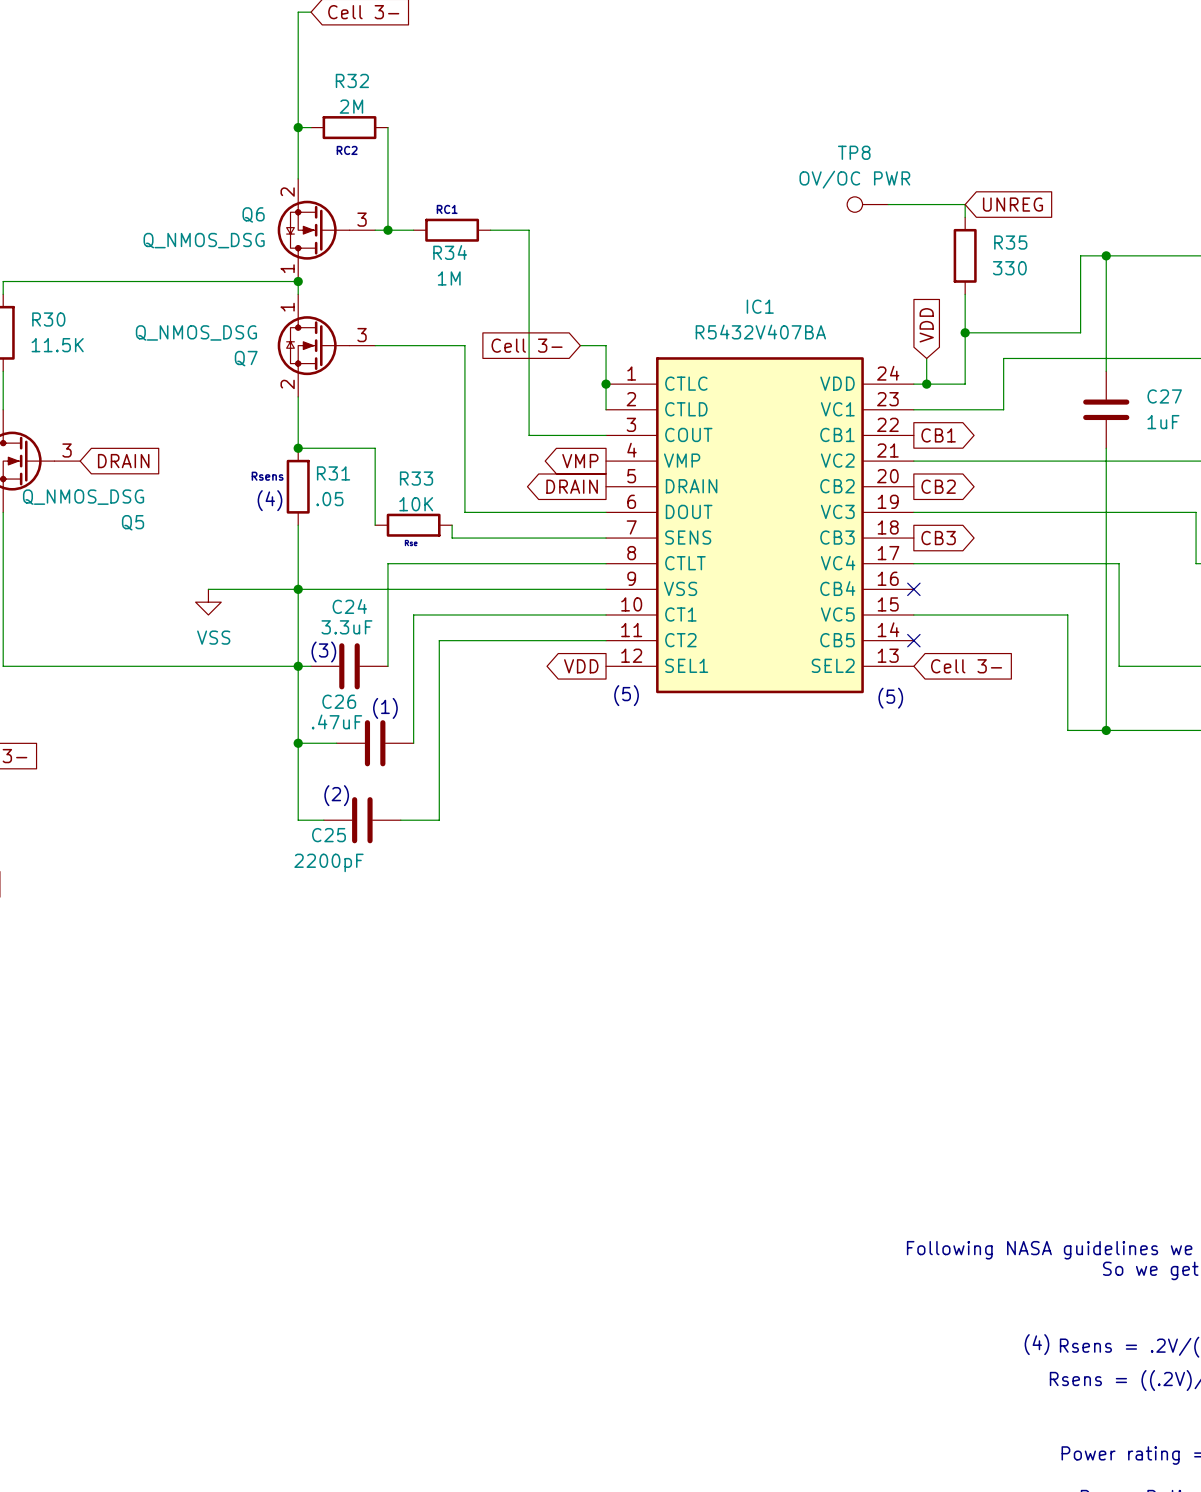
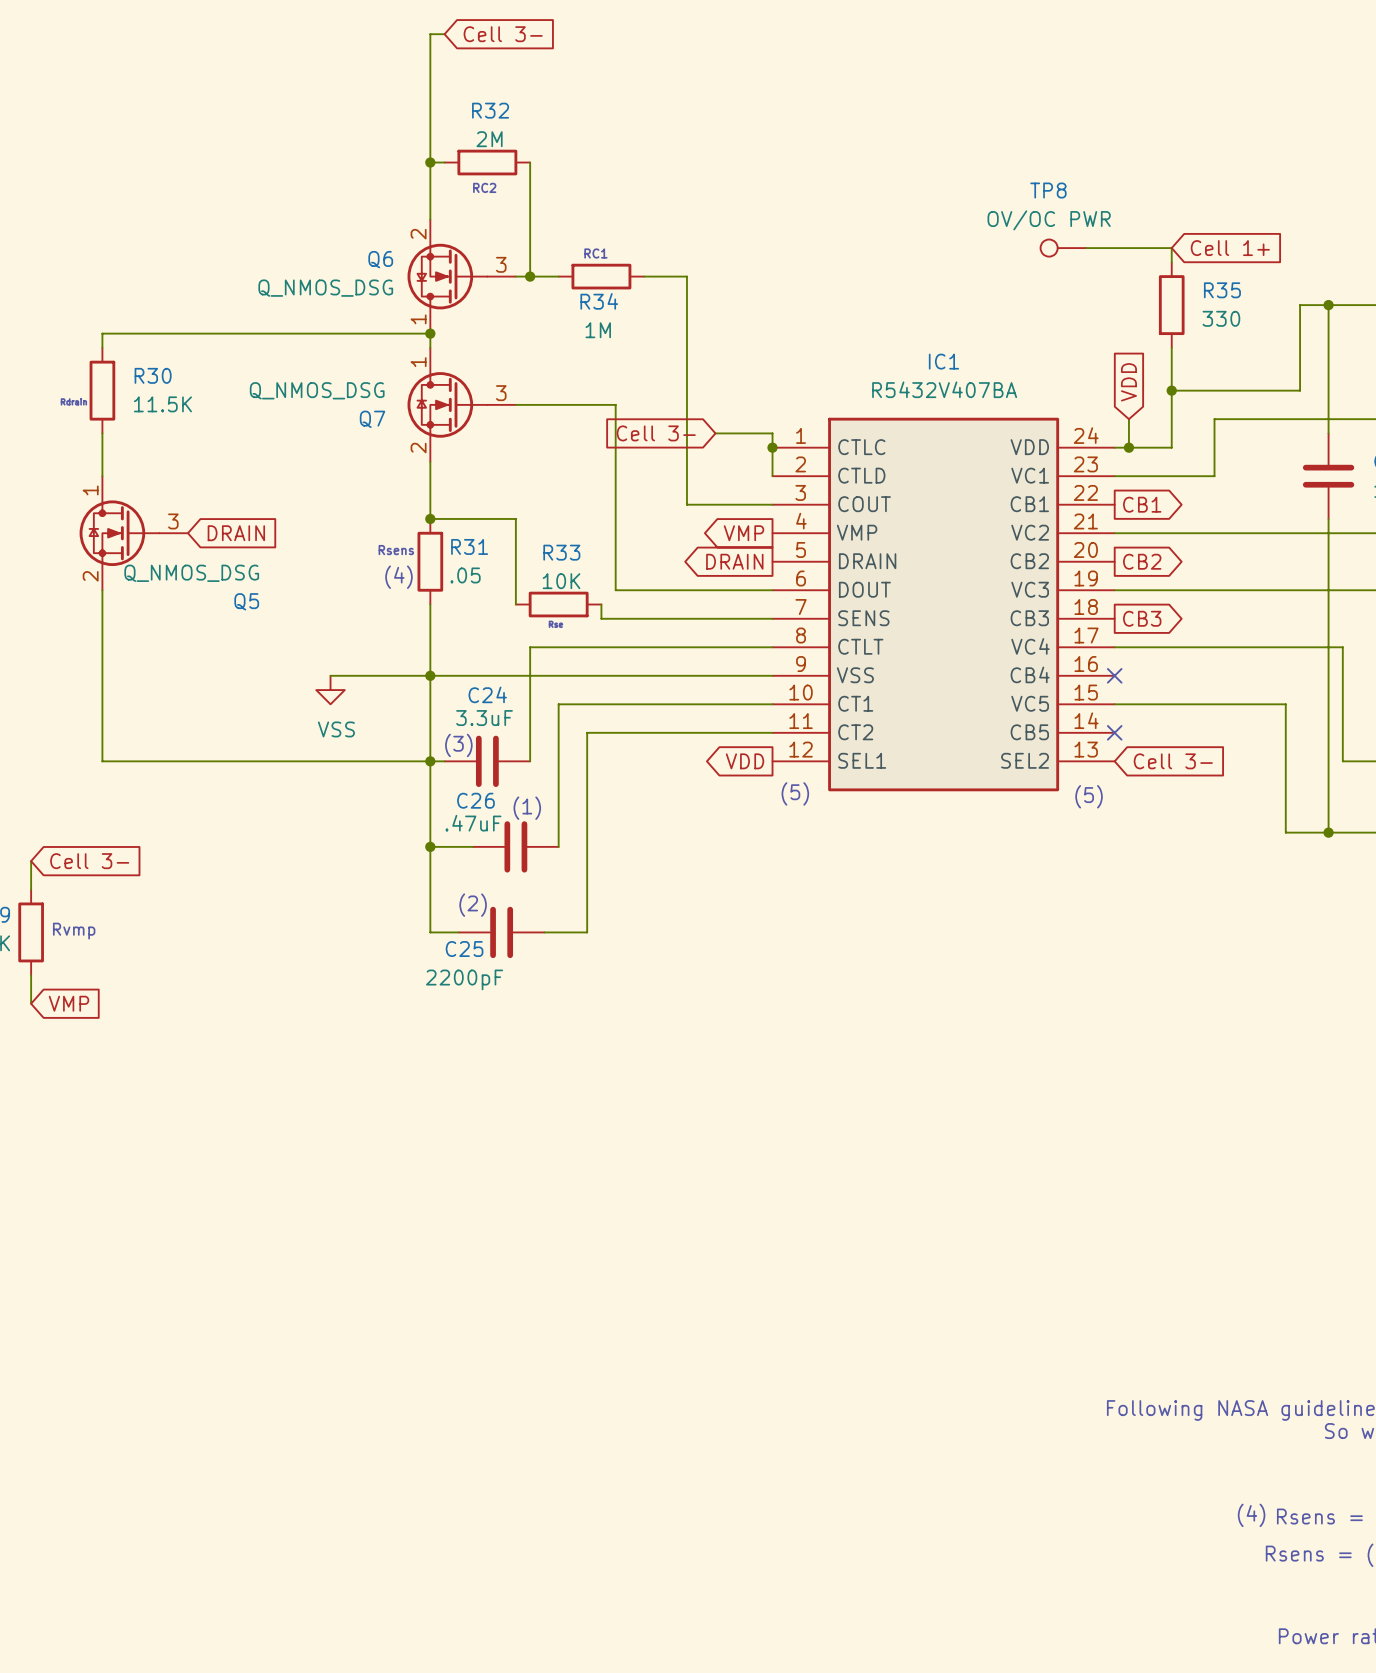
global label: UNREG (1012, 204) -> Cell 1+ (1230, 248)
global label position: Cell 3- (527, 345) -> Cell 3- (656, 433)
wire: (580, 345) (606, 345) (606, 371) -> (715, 433) (772, 433)

